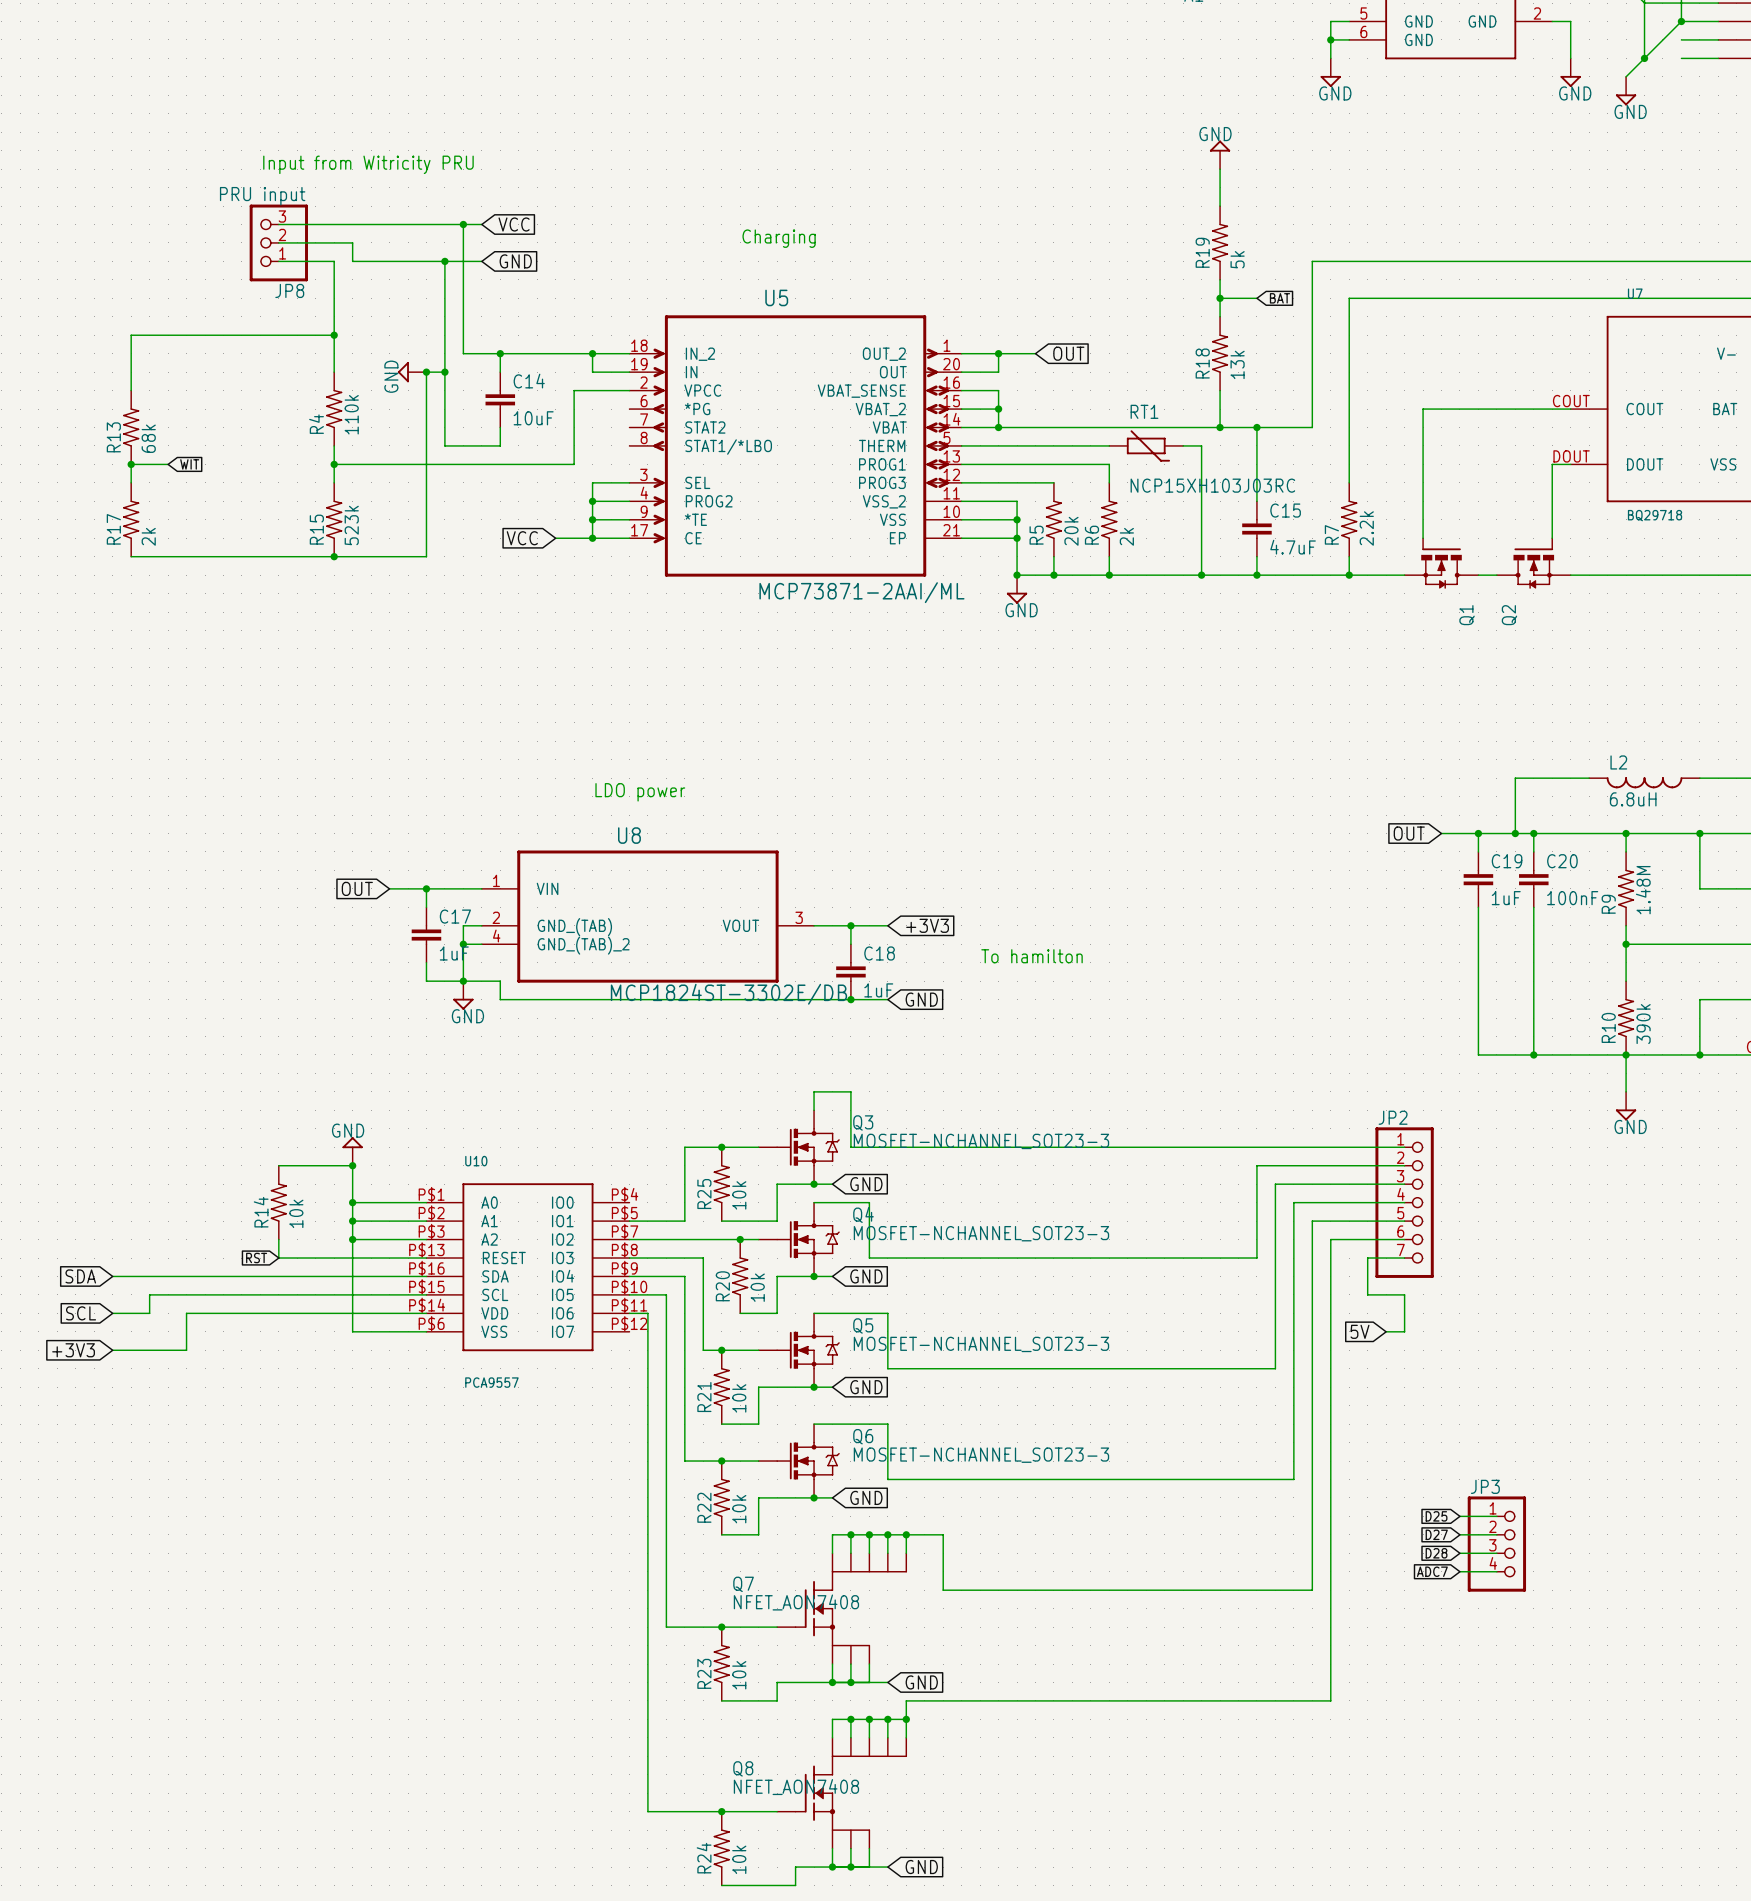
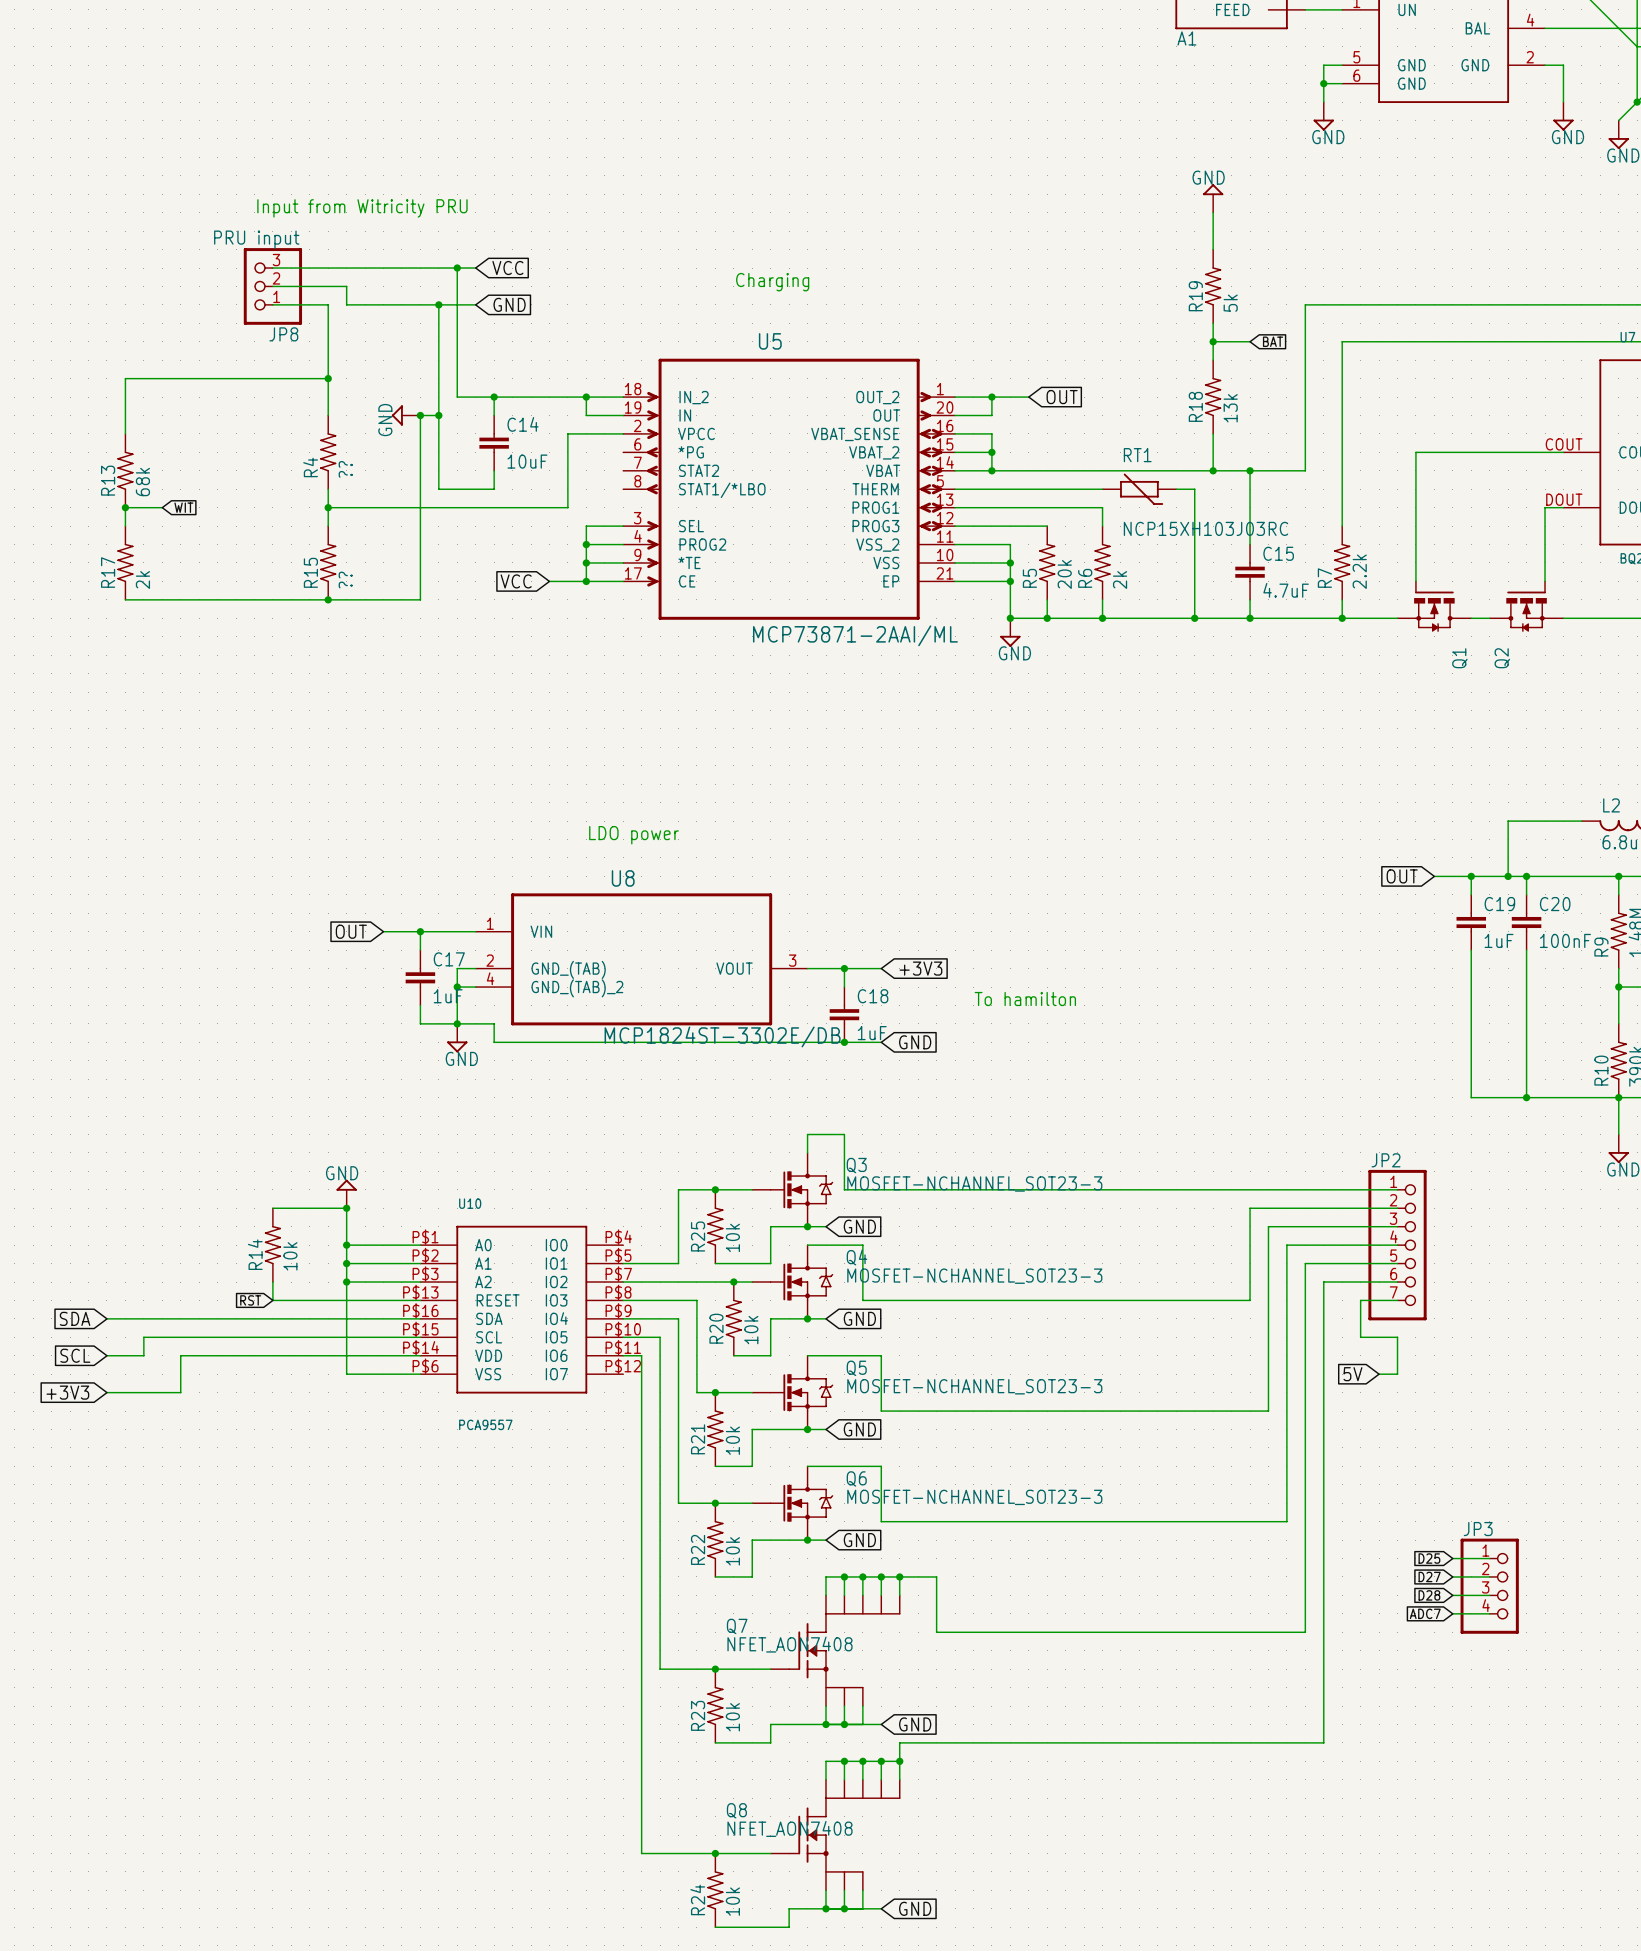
R4 value: 110k (351, 414) -> ?? (345, 469)
R15 value: 523k (351, 525) -> ?? (345, 580)

